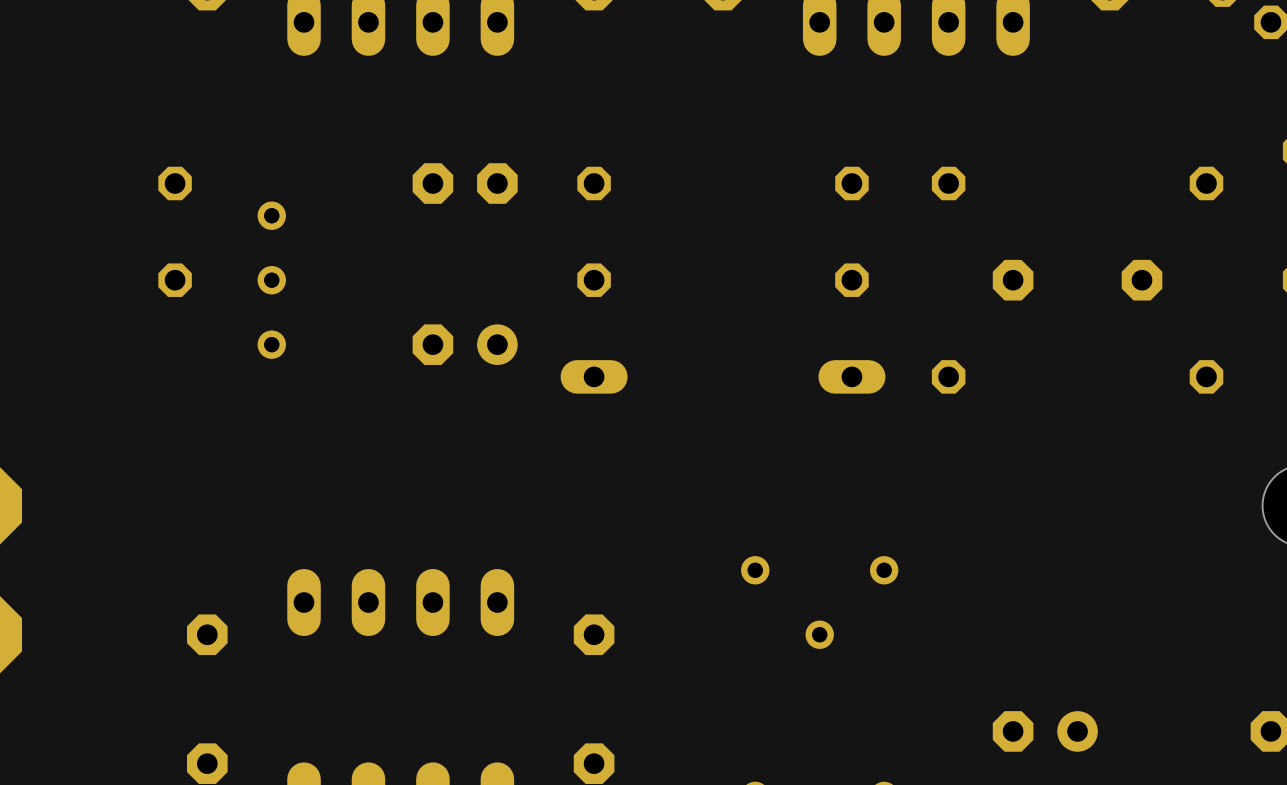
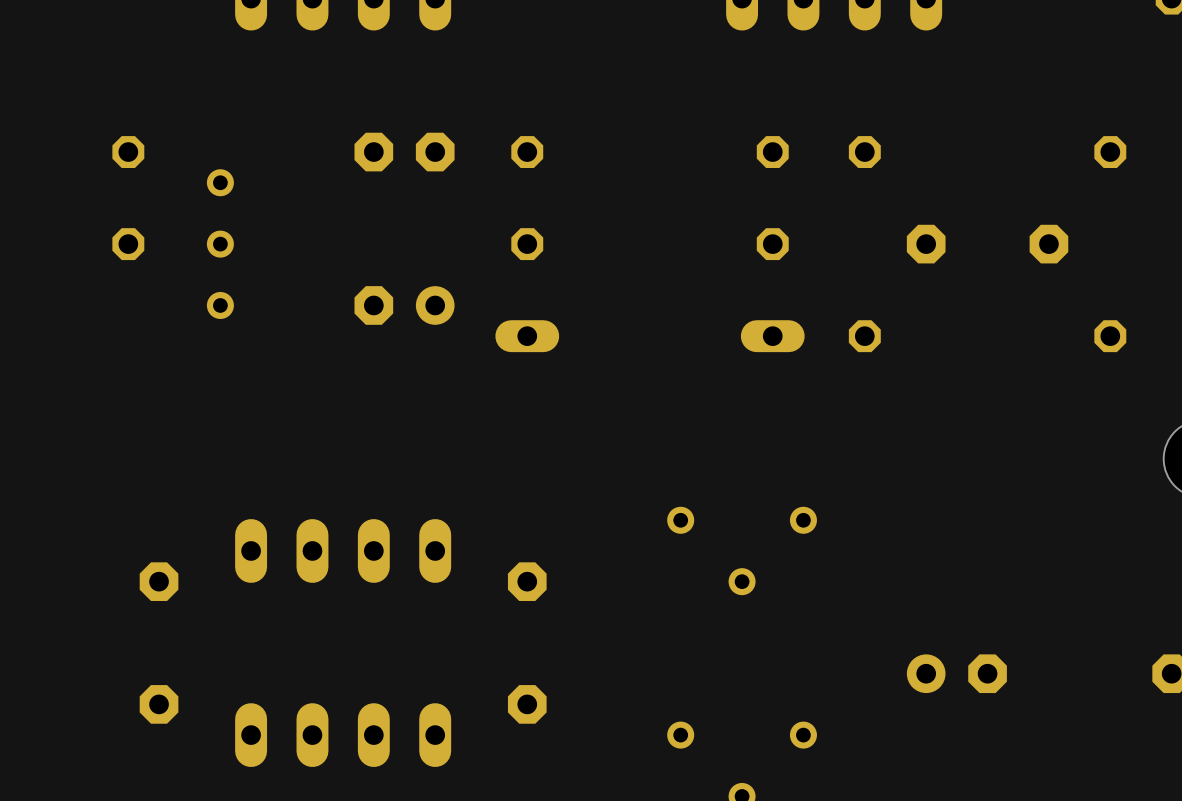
part rotation: 0° (1045, 731) -> 180° (956, 673)

